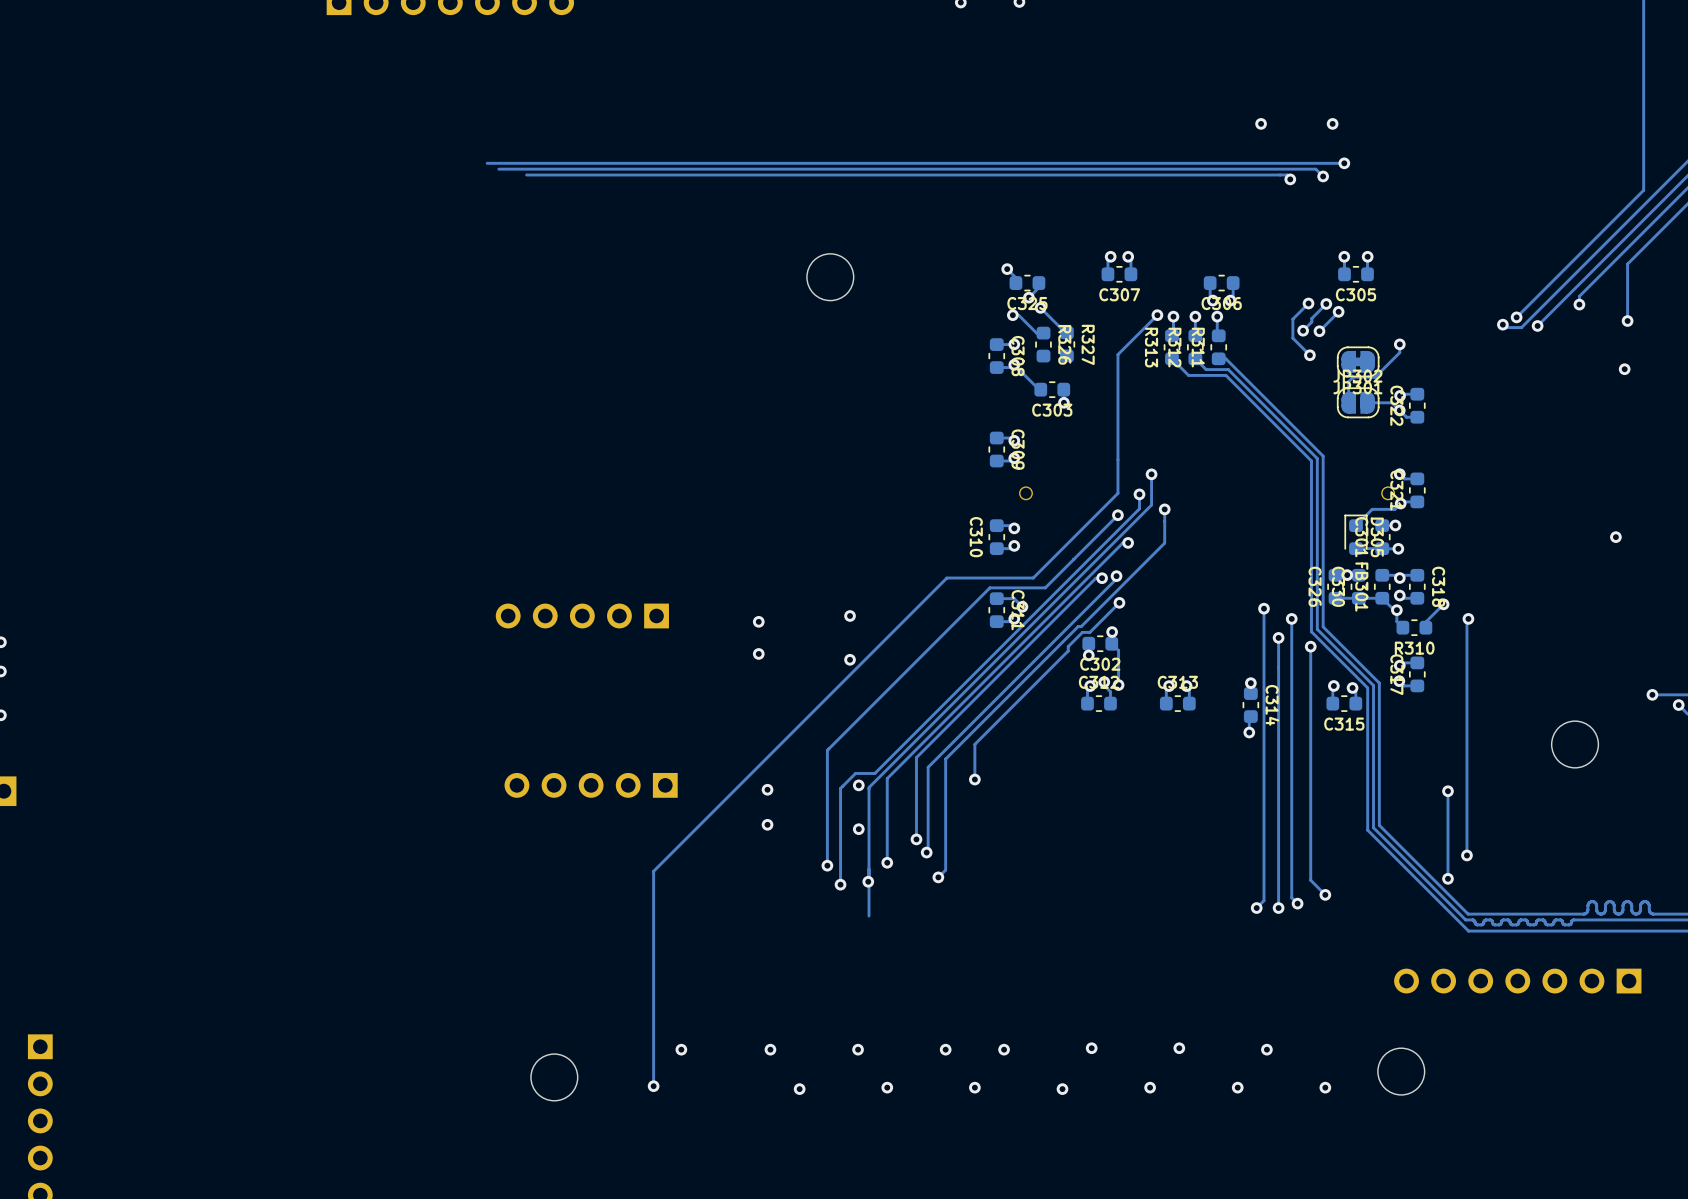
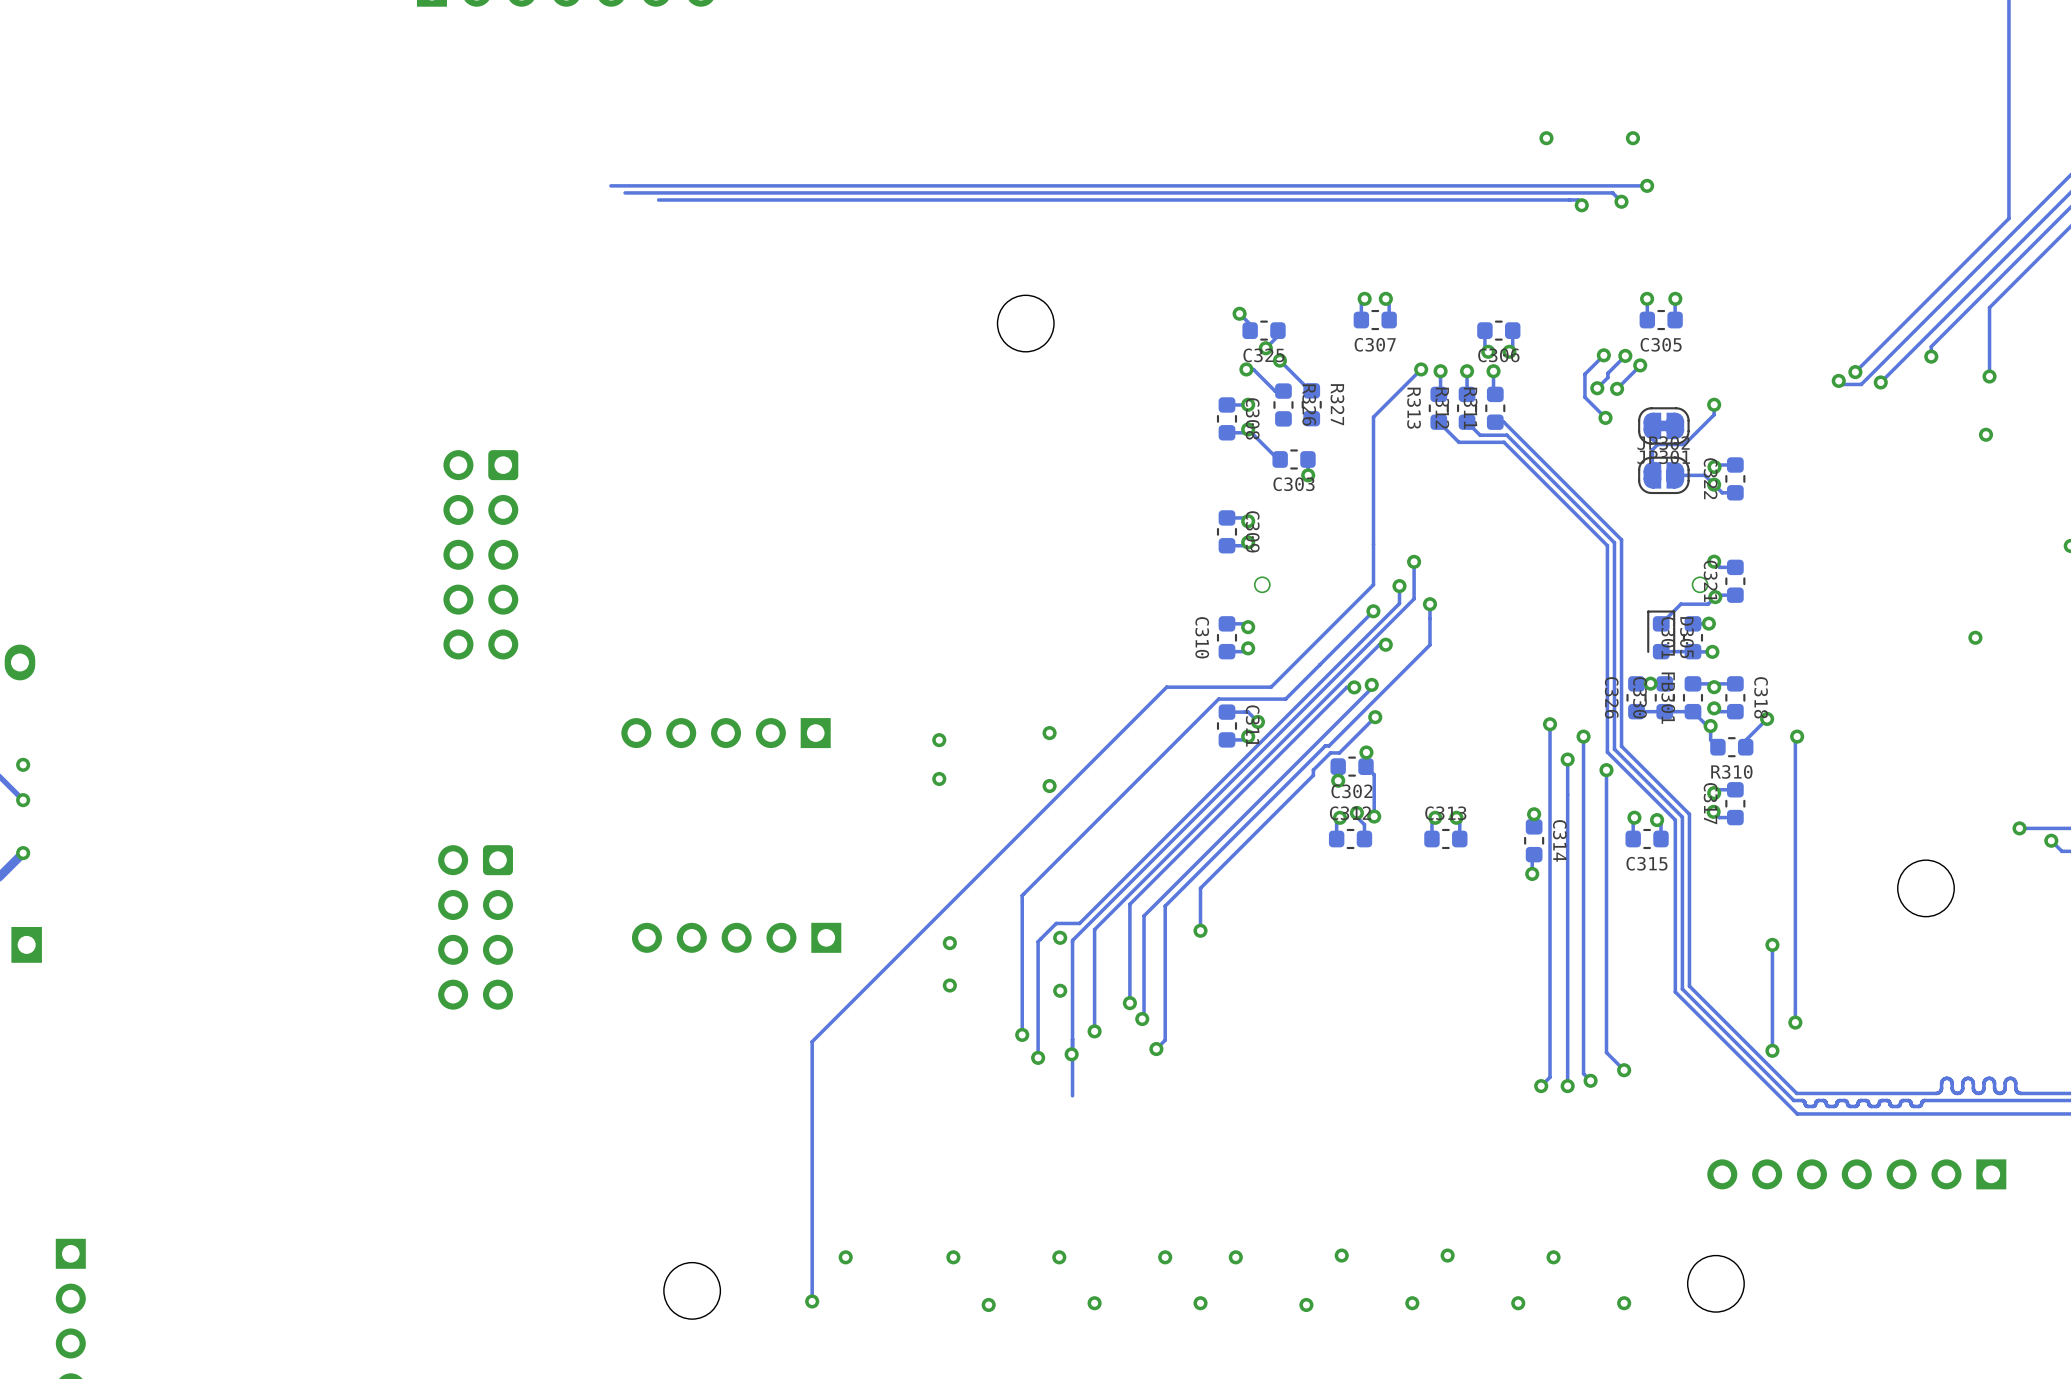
part: none -> (480, 554)
part: none -> (475, 927)

